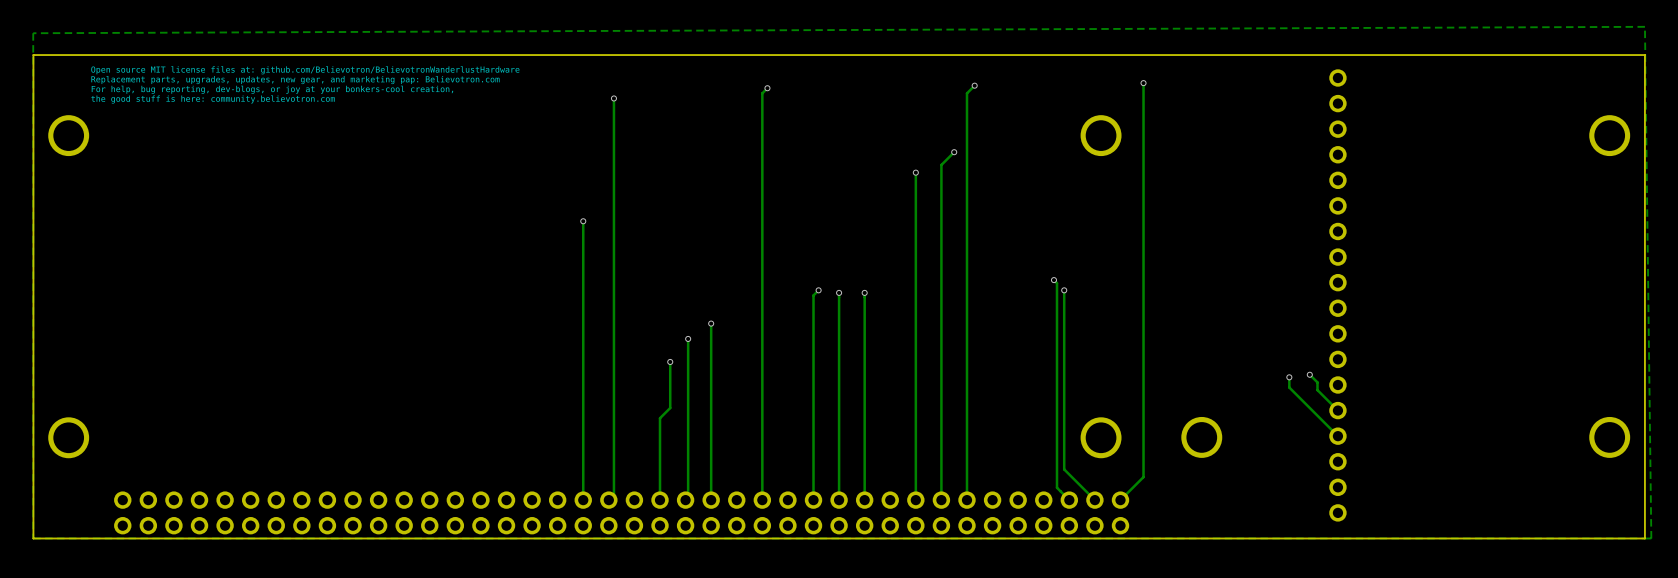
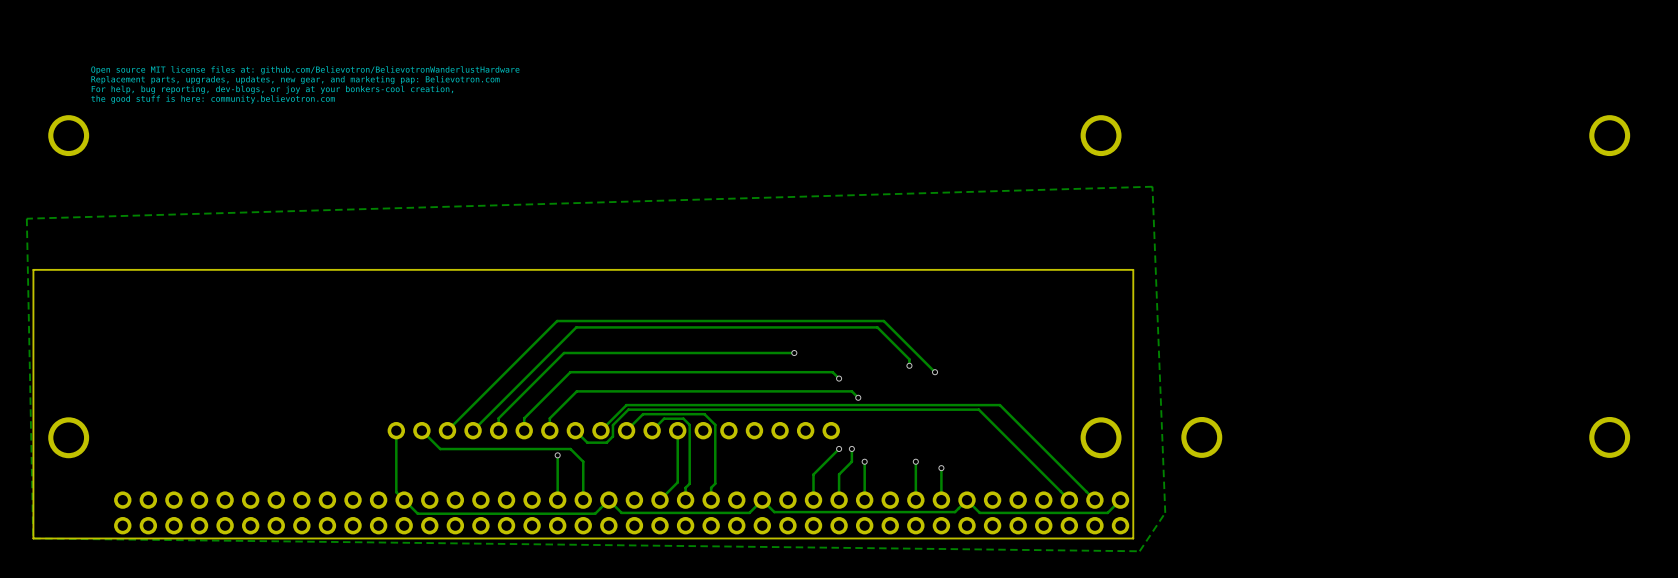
zone outline: (1644, 26) (1651, 538) (33, 538) (33, 33) (1644, 26) -> none
part: (1337, 78) -> none
track: (1143, 83) (1143, 477) (1120, 500) -> (396, 430) (396, 492) (417, 513) (595, 513) (608, 500) (621, 512) (749, 512) (762, 500) (774, 512) (955, 512) (967, 500) (979, 512) (1107, 512) (1120, 500)
via: (1143, 83) -> none
track: (974, 85) (967, 93) (967, 500) -> none
via: (974, 85) -> none
track: (767, 88) (762, 93) (762, 500) -> none
via: (767, 88) -> none
track: (613, 98) (613, 495) (608, 500) -> none
via: (613, 98) -> none
part: (1337, 103) -> none
part: (1337, 129) -> none
track: (954, 152) (941, 164) (941, 468) -> none
via: (954, 152) -> none
part: (1337, 154) -> none
track: (915, 172) (915, 461) -> none
via: (915, 172) -> none
part: (1337, 180) -> none
zone outline: none -> (1152, 186) (1165, 512) (1139, 551) (33, 538) (26, 218) (1152, 186)
part: (1337, 205) -> none
track: (583, 221) (583, 461) -> (421, 430) (440, 449) (570, 449) (583, 461)
via: (583, 221) -> none
part: (1337, 231) -> none
part: (1337, 257) -> none
board edge: (33, 269) (33, 55) (1644, 55) (1644, 538) (1133, 538) -> (33, 269) (1133, 269) (1133, 538)
track: (1053, 280) (1057, 283) (1057, 487) -> (575, 430) (587, 442) (606, 442) (612, 436) (612, 425) (628, 409) (978, 409) (1057, 487)
via: (1053, 280) -> none
part: (1337, 282) -> none
track: (818, 290) (813, 295) (813, 474) -> (839, 448) (813, 474)
via: (818, 290) -> none
track: (1064, 290) (1064, 469) -> (600, 430) (626, 405) (999, 405) (1064, 469)
via: (1064, 290) -> none
track: (839, 292) (839, 474) -> (851, 448) (851, 461) (839, 474)
via: (839, 292) -> none
track: (864, 292) (864, 461) -> none
via: (864, 292) -> none
part: (1337, 308) -> none
track: (711, 323) (711, 487) -> (626, 430) (643, 414) (704, 414) (715, 424) (715, 483) (711, 487)
via: (711, 323) -> none
part: (1337, 333) -> none
track: (688, 338) (688, 497) (685, 500) -> (652, 430) (664, 418) (683, 418) (689, 424) (689, 483) (685, 487) (685, 500)
via: (688, 338) -> none
track: none -> (794, 353) (564, 353) (498, 418) (498, 430)
via: none -> (794, 353)
part: (1337, 359) -> none
track: (670, 361) (670, 408) (660, 418) (660, 500) -> (677, 430) (677, 482) (660, 500)
via: (670, 361) -> none
track: none -> (909, 365) (909, 359) (877, 327) (576, 327) (473, 430)
via: none -> (909, 365)
track: none -> (935, 372) (883, 321) (557, 321) (447, 430)
via: none -> (935, 372)
track: (1309, 374) (1317, 382) (1317, 390) (1337, 410) -> none
via: (1309, 374) -> none
track: (1289, 377) (1289, 387) (1337, 436) -> none
via: (1289, 377) -> none
track: none -> (839, 378) (832, 372) (570, 372) (524, 418) (524, 430)
via: none -> (839, 378)
part: (1337, 384) -> none
track: none -> (858, 397) (851, 391) (576, 391) (549, 418) (549, 430)
via: none -> (858, 397)
part: (1337, 410) -> none
part: none -> (396, 430)
part: none -> (421, 430)
part: none -> (447, 430)
part: none -> (473, 430)
part: none -> (498, 430)
part: none -> (524, 430)
part: none -> (549, 430)
part: none -> (575, 430)
part: none -> (600, 430)
part: none -> (626, 430)
part: none -> (652, 430)
part: none -> (677, 430)
part: none -> (703, 430)
part: none -> (728, 430)
part: none -> (754, 430)
part: none -> (780, 430)
part: none -> (805, 430)
part: none -> (831, 430)
part: (1337, 436) -> none
via: none -> (839, 448)
via: none -> (851, 448)
track: none -> (557, 455) (557, 500)
via: none -> (557, 455)
via: none -> (864, 461)
via: none -> (915, 461)
part: (1337, 461) -> none
via: none -> (941, 468)
part: (1337, 487) -> none
part: (1337, 512) -> none

